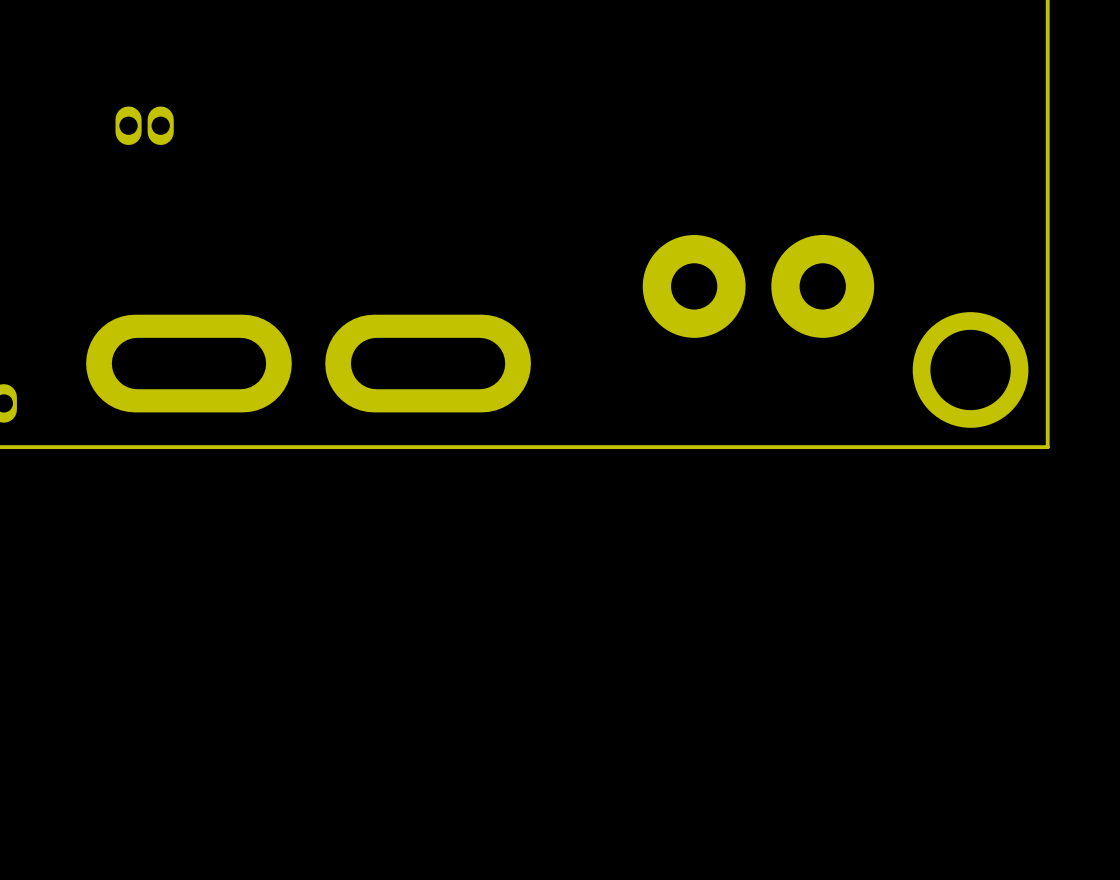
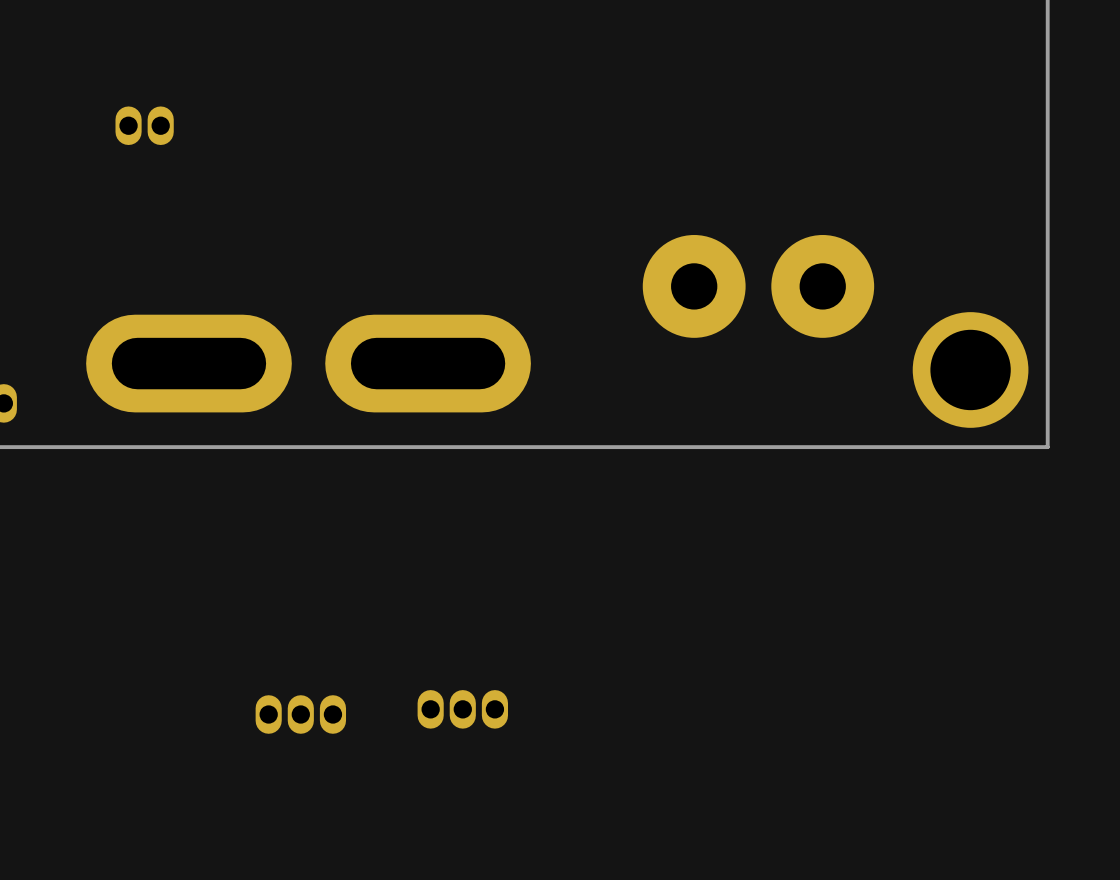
part: none -> (462, 709)
part: none -> (300, 714)

